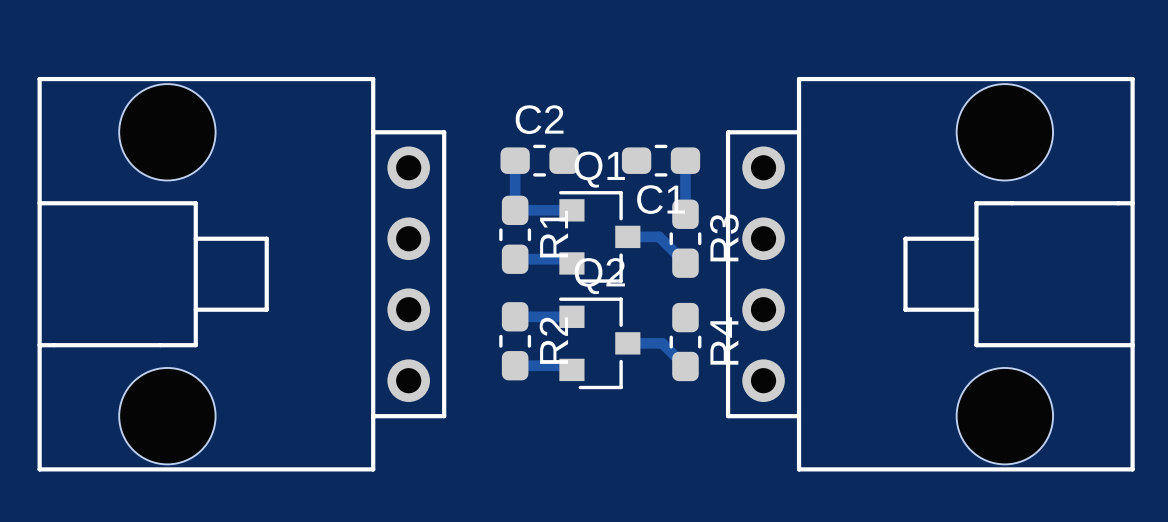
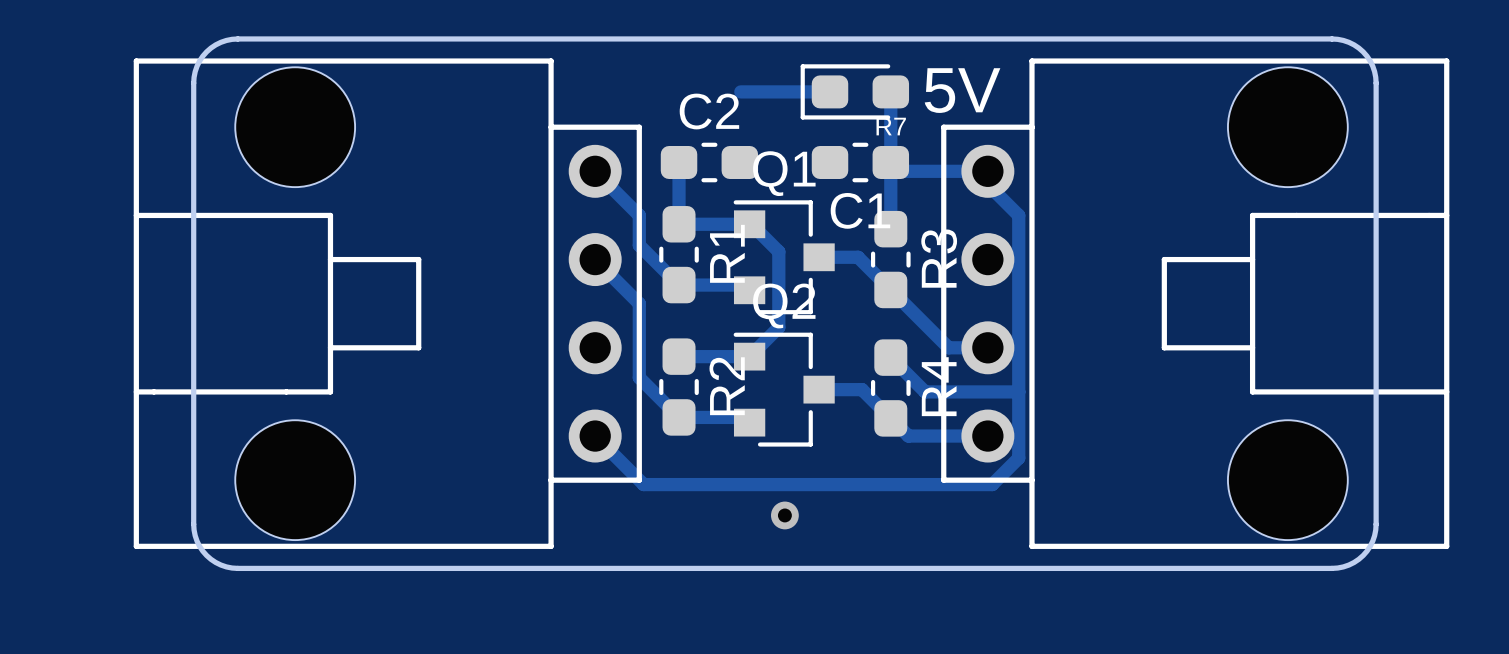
board edge: none -> (237, 38) (1332, 38) (1348, 42) (1358, 48) (1370, 61) (1374, 71) (1376, 83) (1376, 524) (1372, 541) (1363, 555) (1354, 562) (1343, 566) (1332, 568) (237, 568) (220, 565) (210, 559) (199, 546) (195, 535) (193, 524) (193, 83) (197, 66) (206, 51) (220, 42) (237, 38)
text: none -> 5V (962, 90)
track: none -> (740, 91) (830, 91)
R7: none -> (854, 91)
track: none -> (890, 91) (890, 162) (899, 171) (974, 171) (1018, 215) (1018, 458) (992, 484) (643, 484) (595, 436)
track: none -> (595, 171) (639, 215) (639, 245) (679, 285)
track: none -> (749, 224) (778, 251) (778, 327) (749, 356)
track: none -> (595, 259) (639, 303) (639, 377) (679, 417)
track: none -> (890, 289) (948, 347) (974, 347)
part position: (241, 274) -> (387, 303)
track: none -> (890, 357) (925, 391) (1018, 391)
track: none -> (890, 418) (908, 436) (974, 436)
via: none -> (784, 515)

